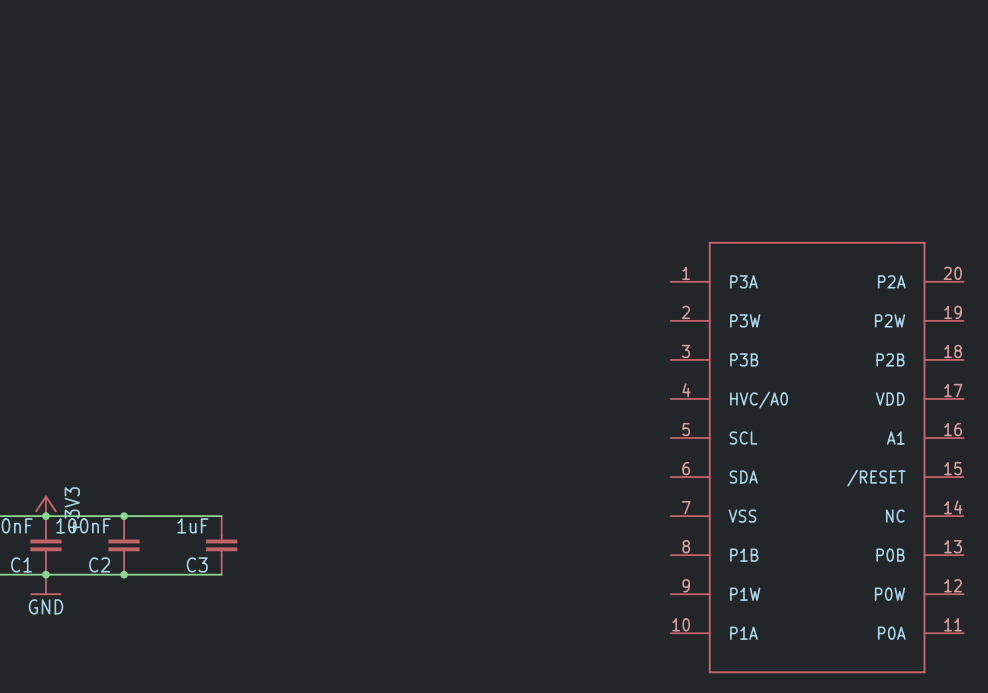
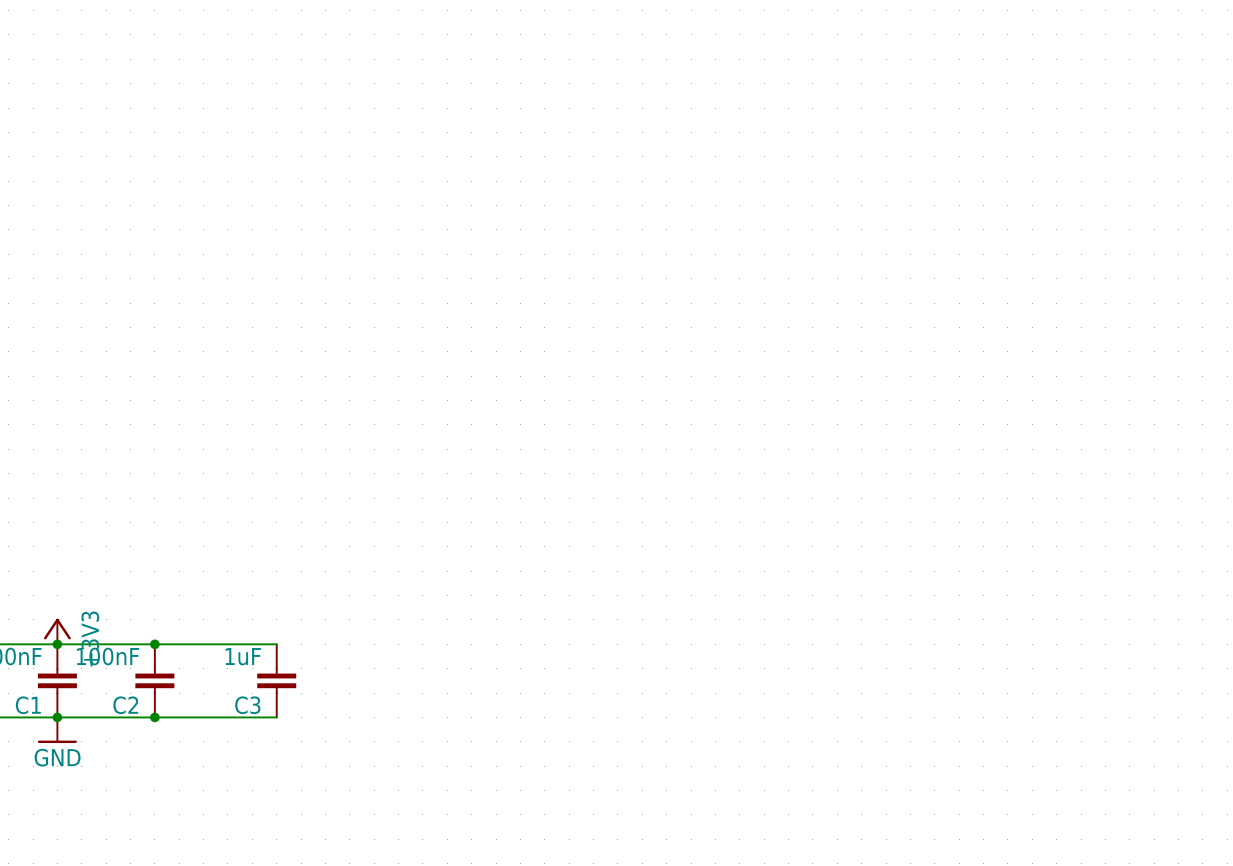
part: (817, 457) -> none

